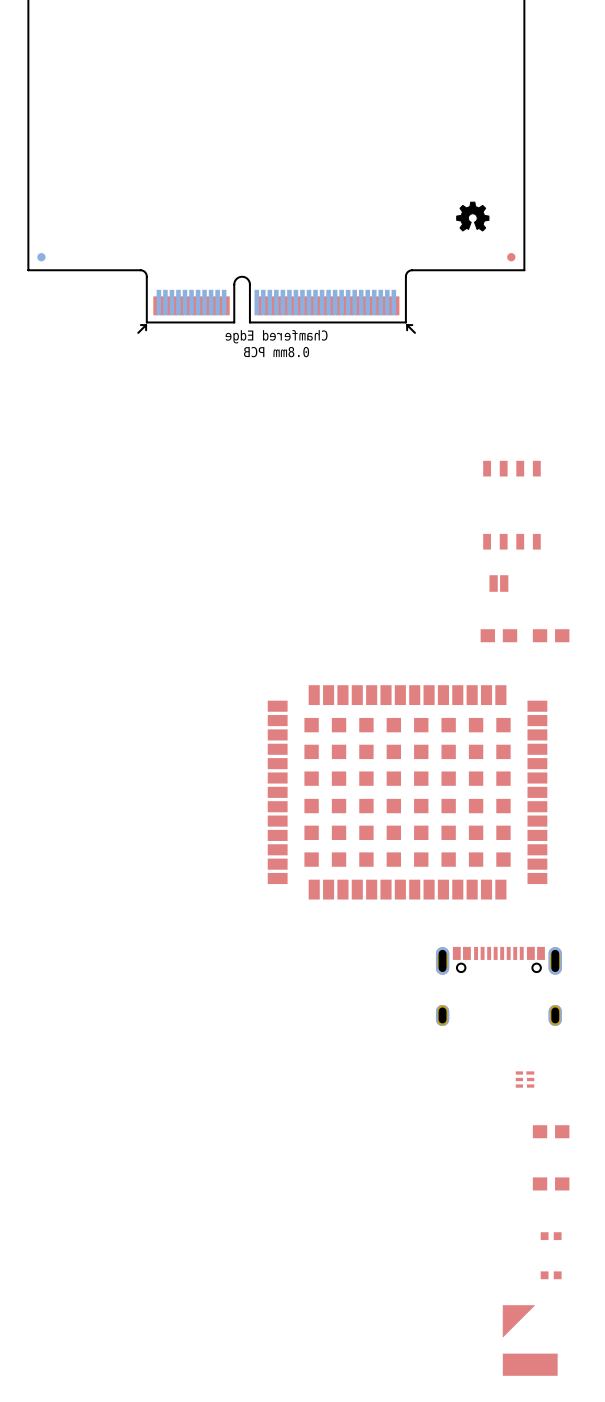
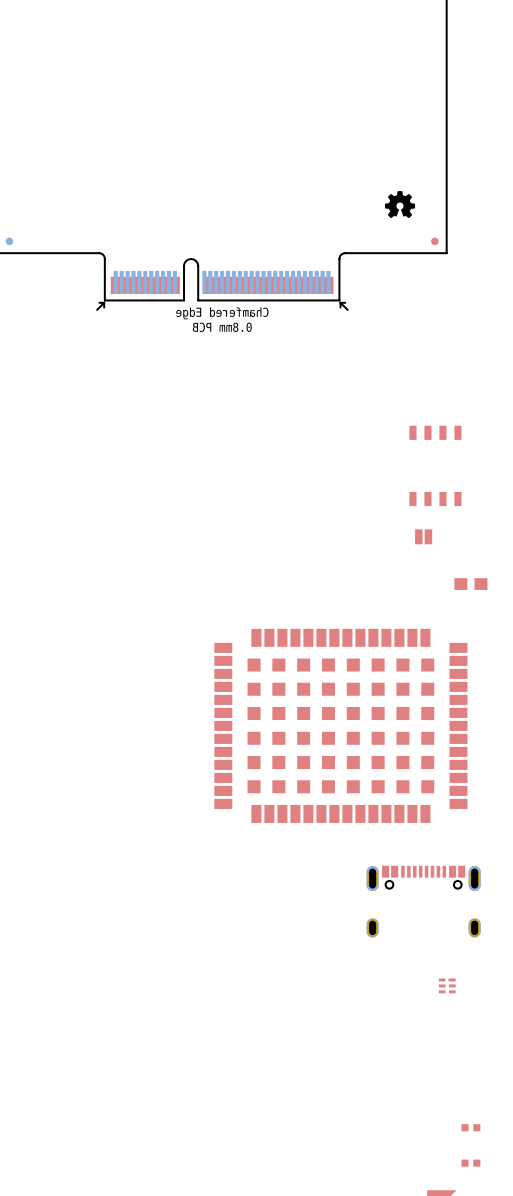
part: (498, 635) -> none
part: (551, 1131) -> none
part: (551, 1183) -> none

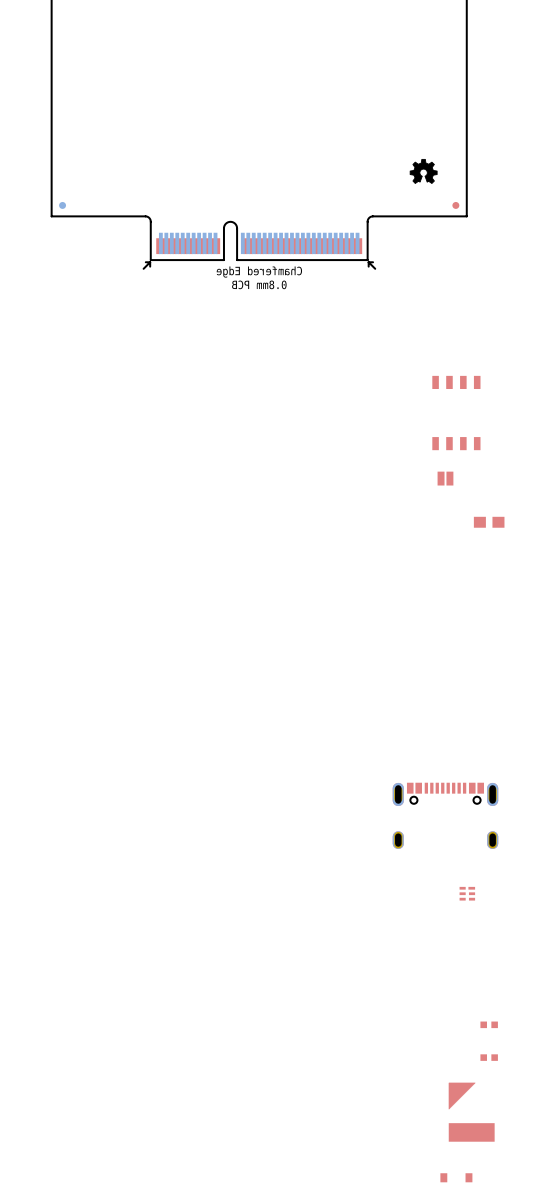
part: (340, 725) -> none

